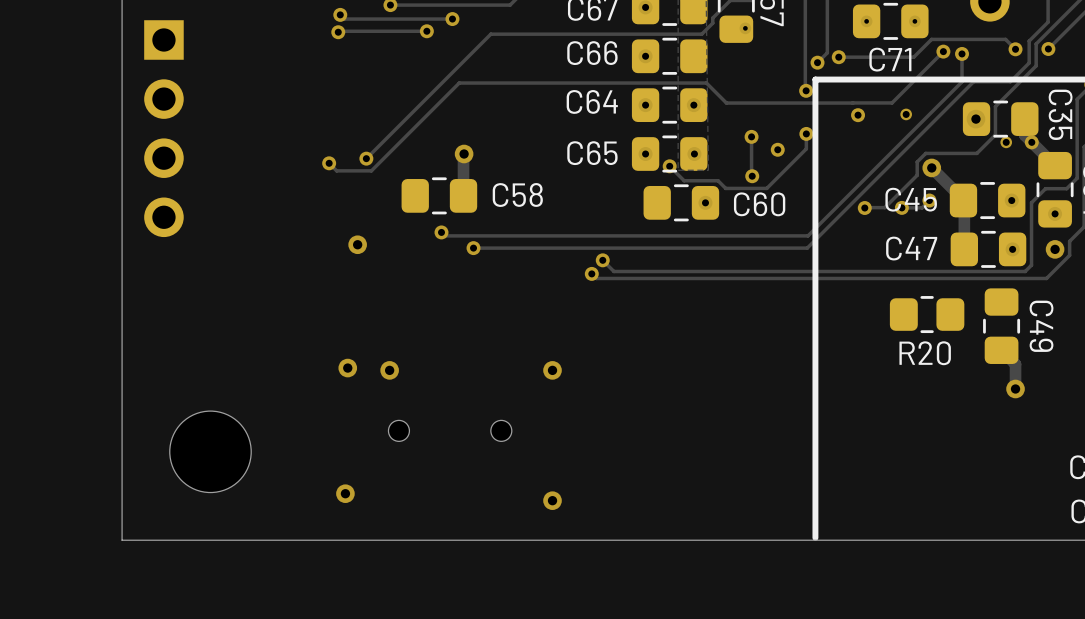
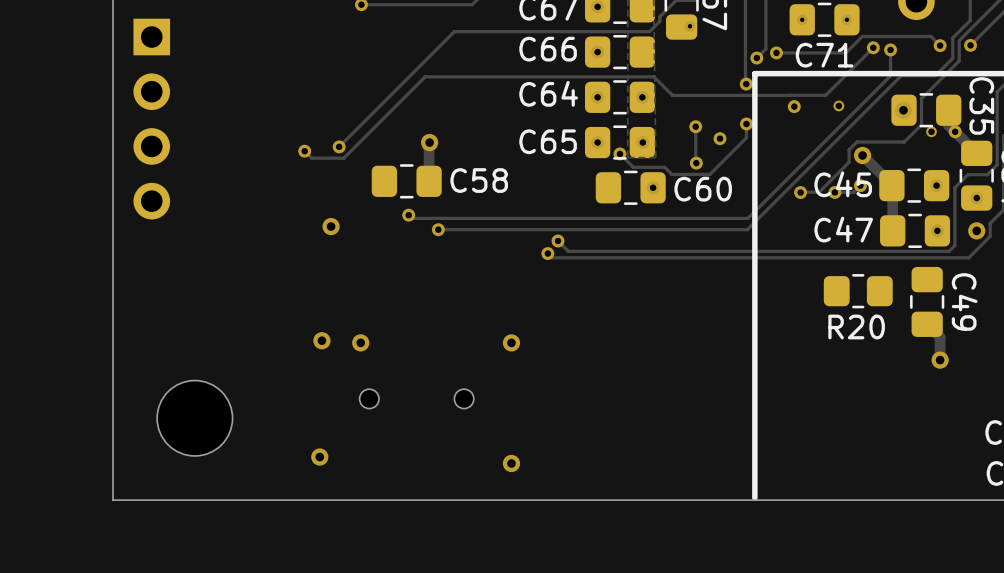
track: (340, 14) (344, 19) (452, 19) -> none
via: (340, 14) -> none
via: (452, 19) -> none
track: (426, 31) (338, 32) -> none
via: (426, 31) -> none
via: (338, 32) -> none

